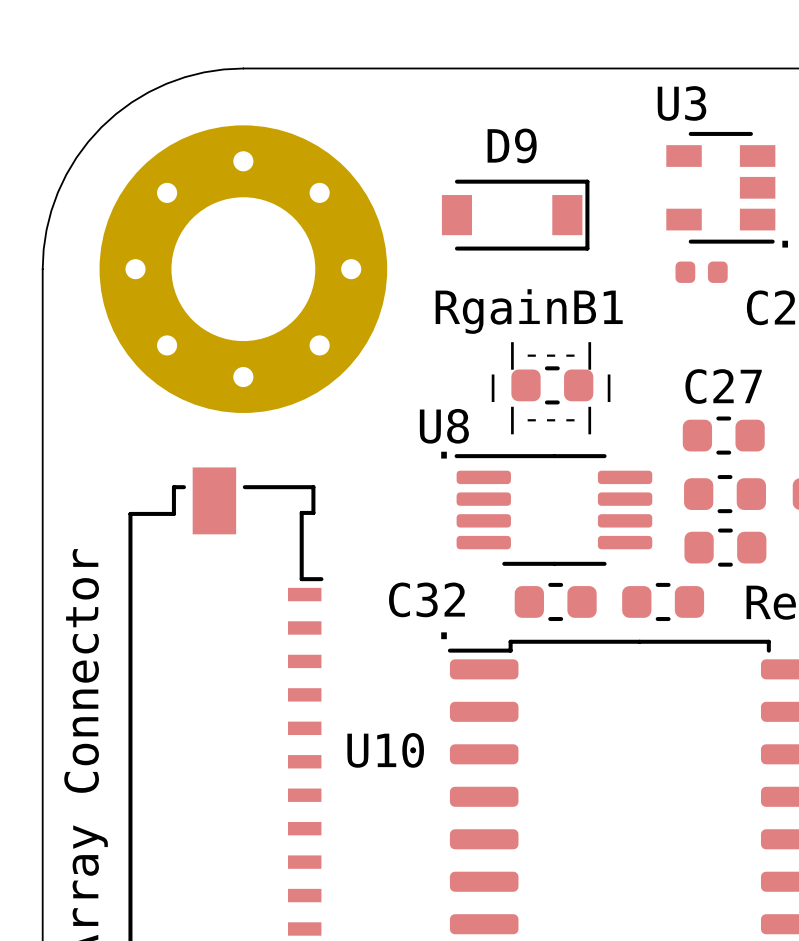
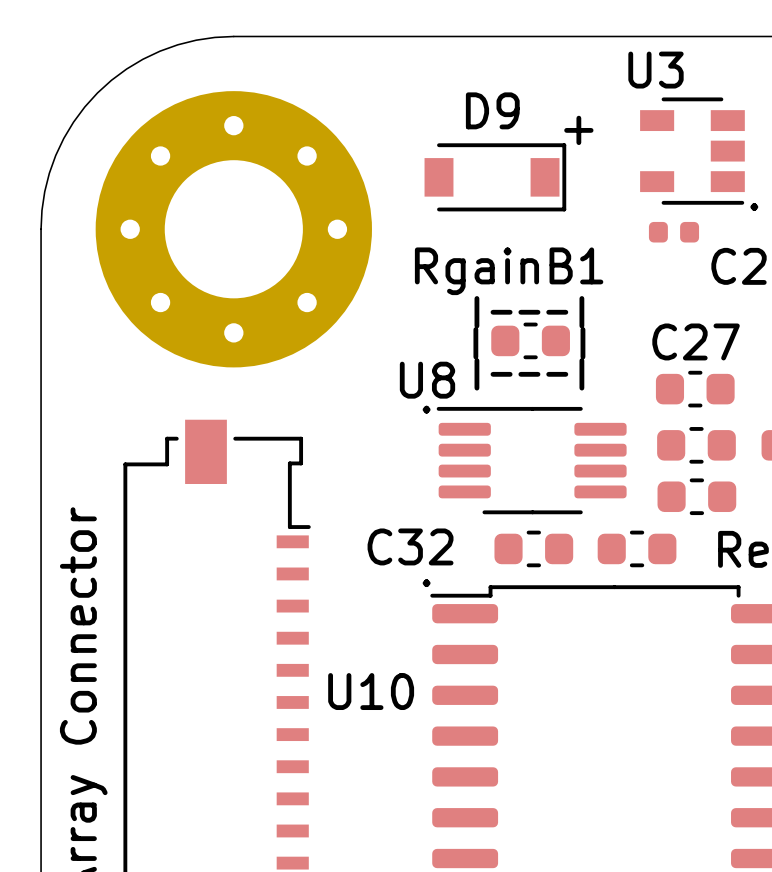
text: none -> + (578, 130)

